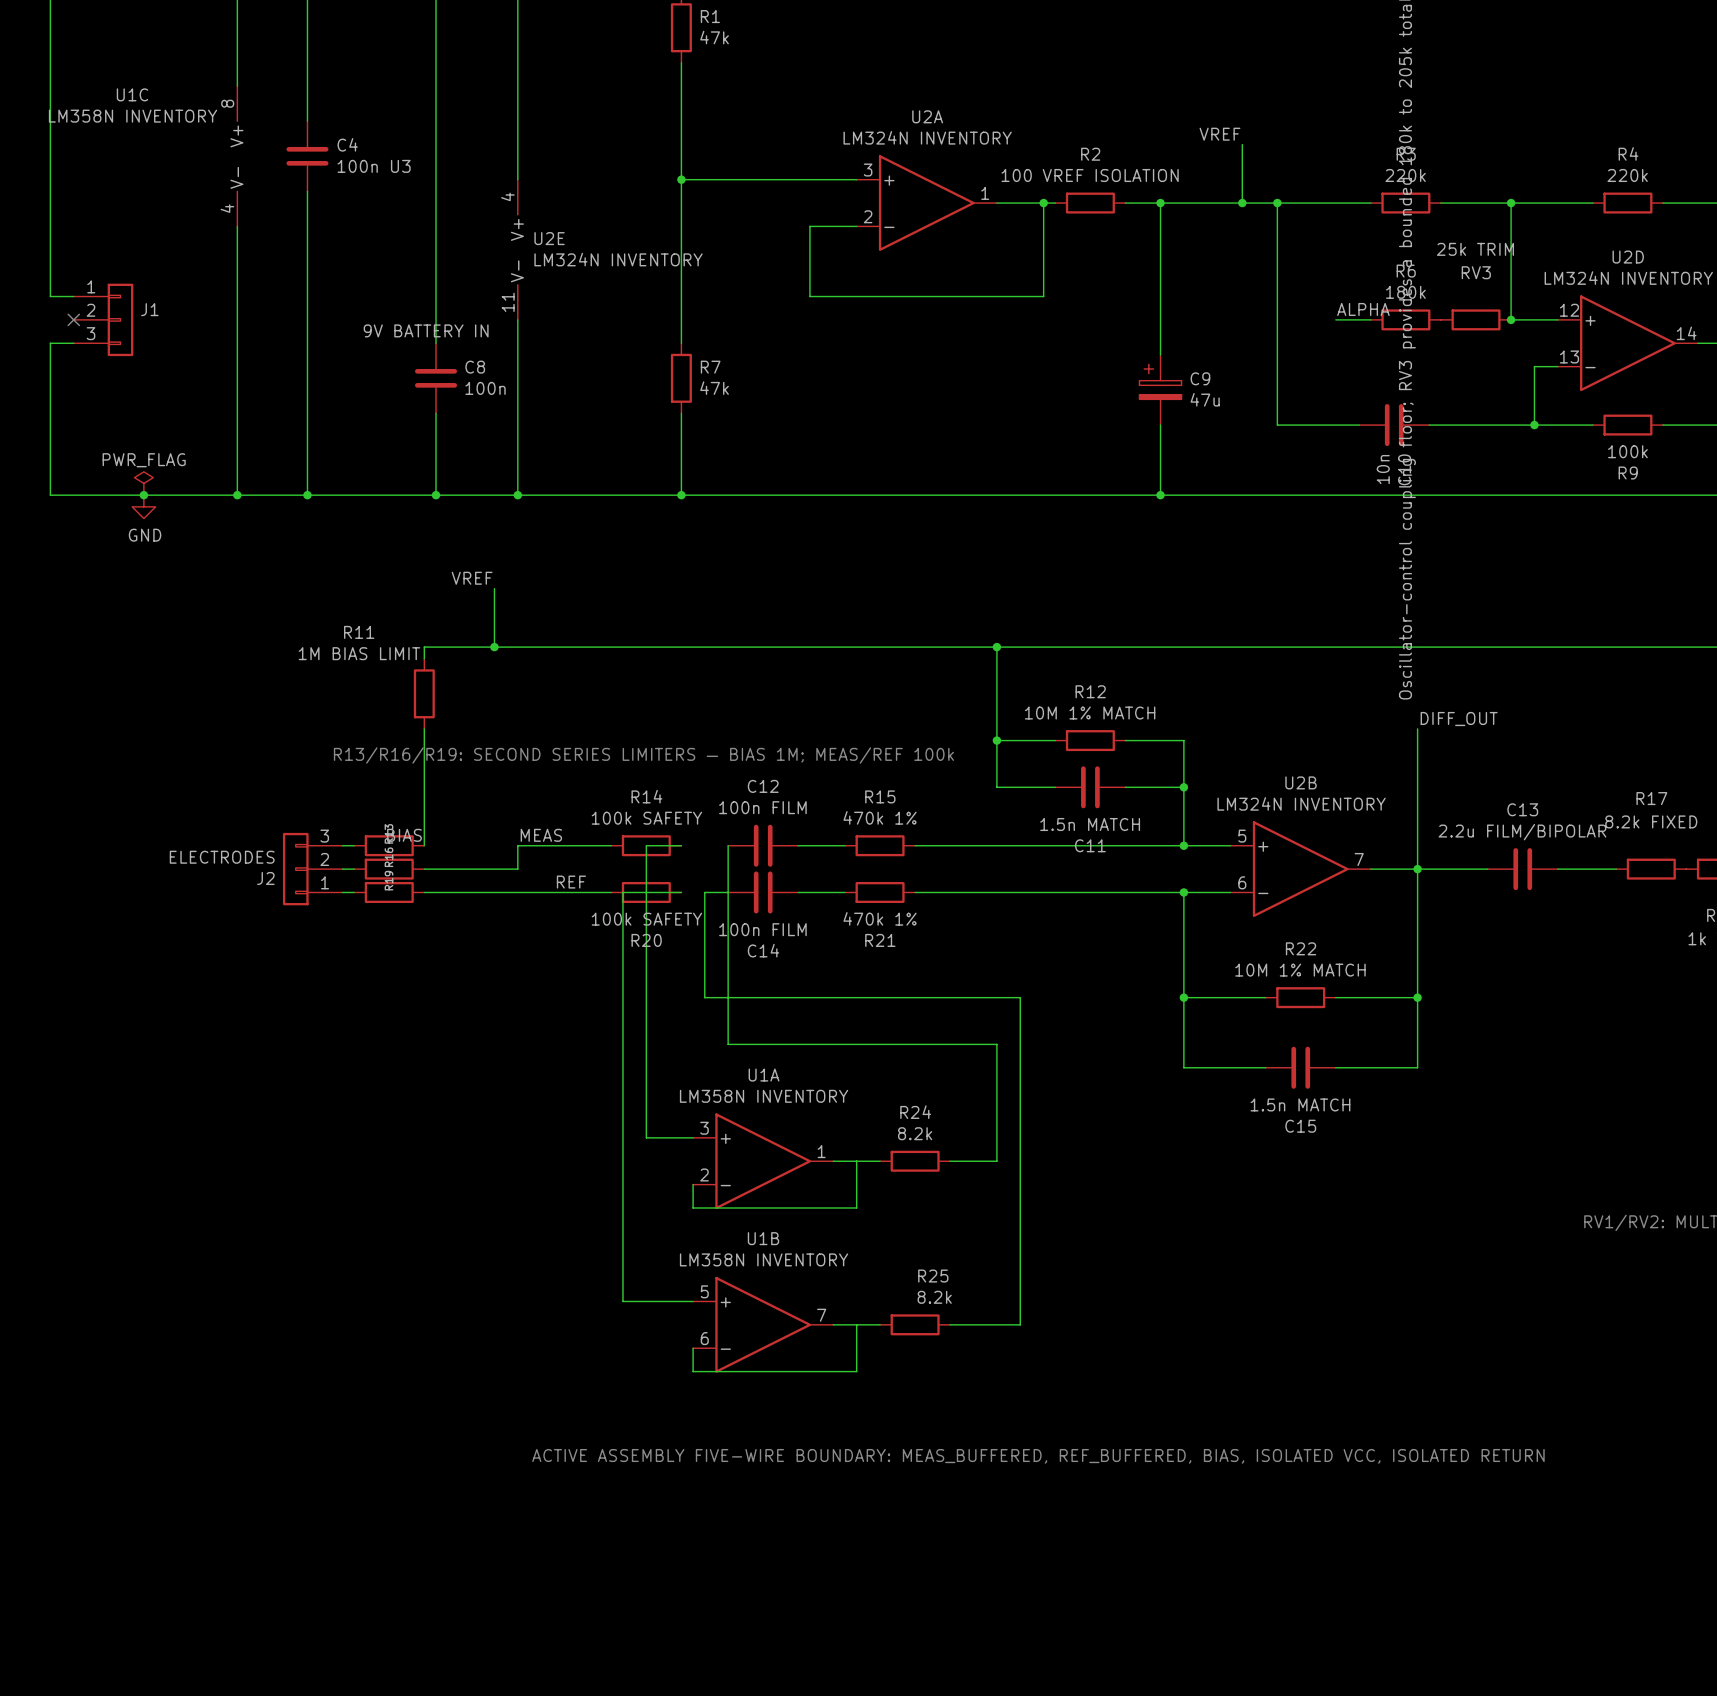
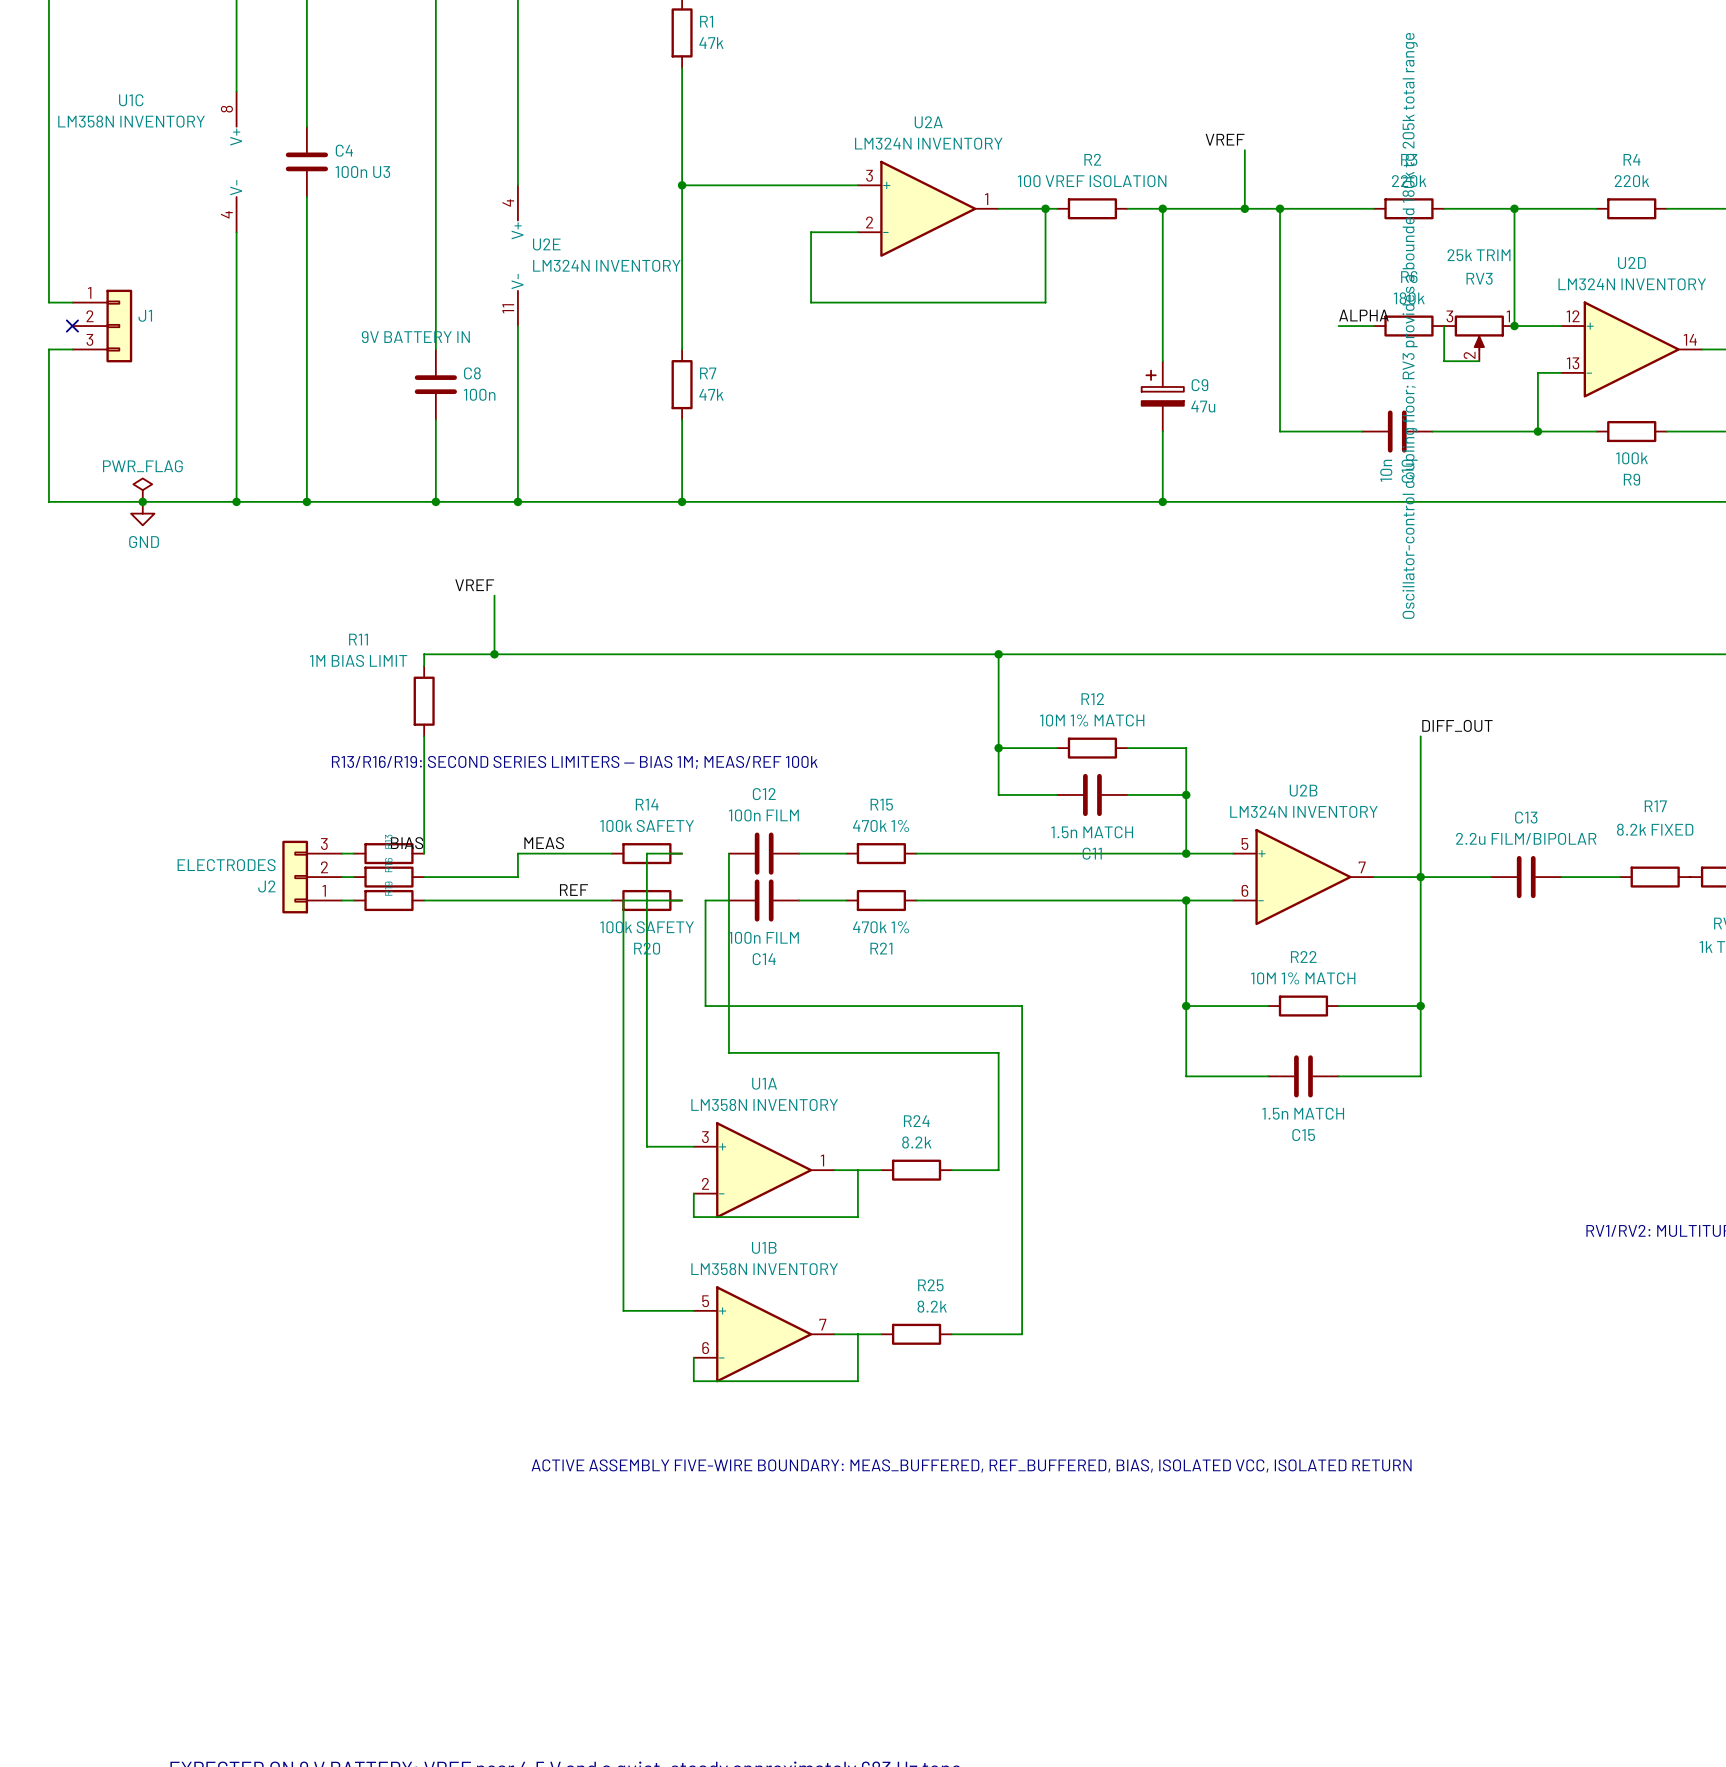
RV3 symbol: [1440, 309, 1512, 331] -> [1444, 315, 1515, 362]
wire: none -> (1444, 326) (1444, 361) (1479, 361)

